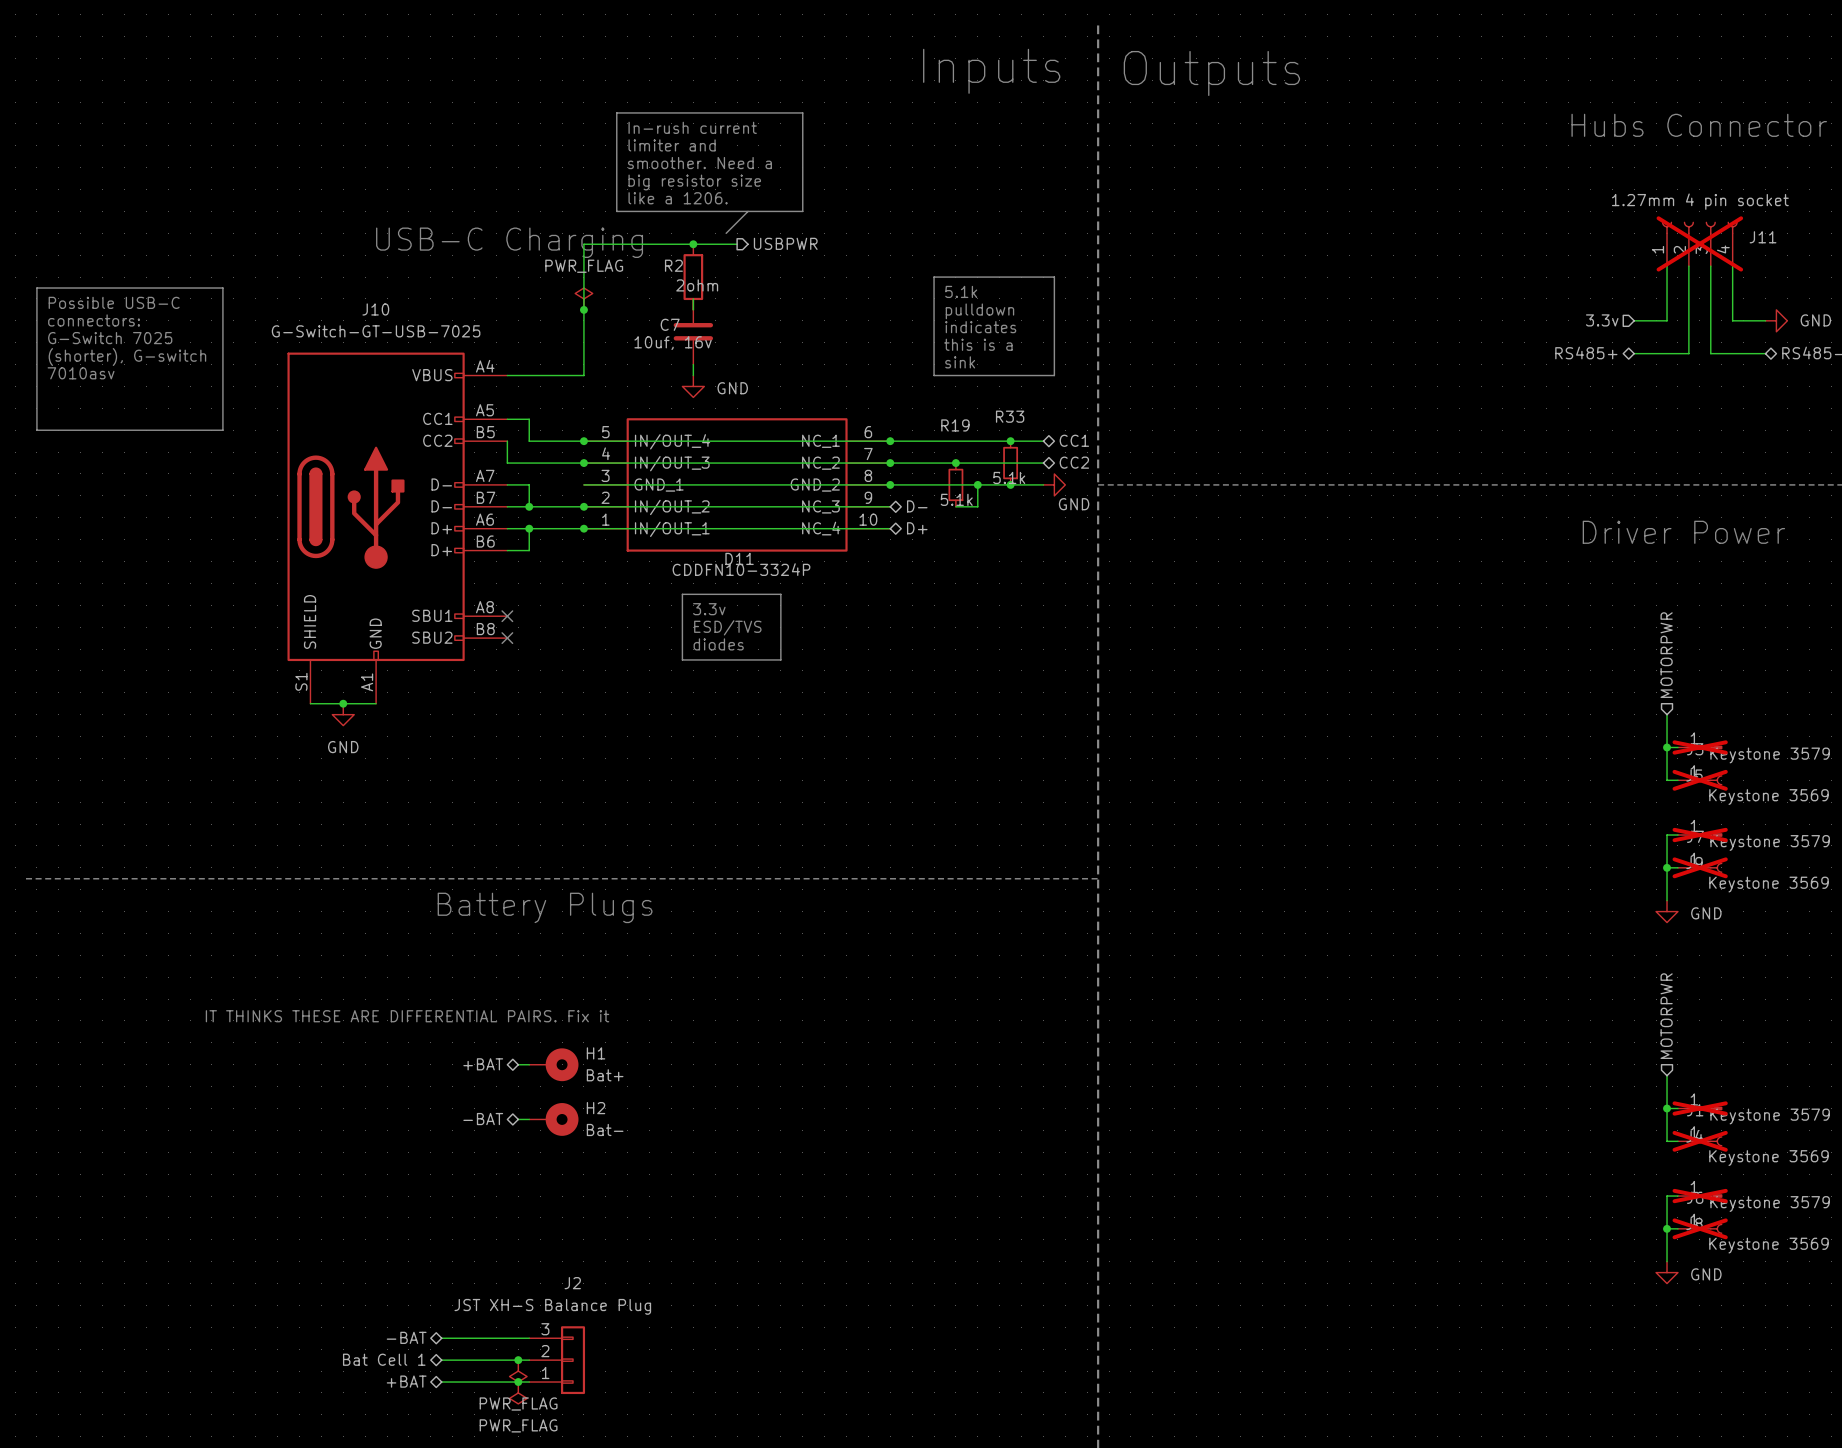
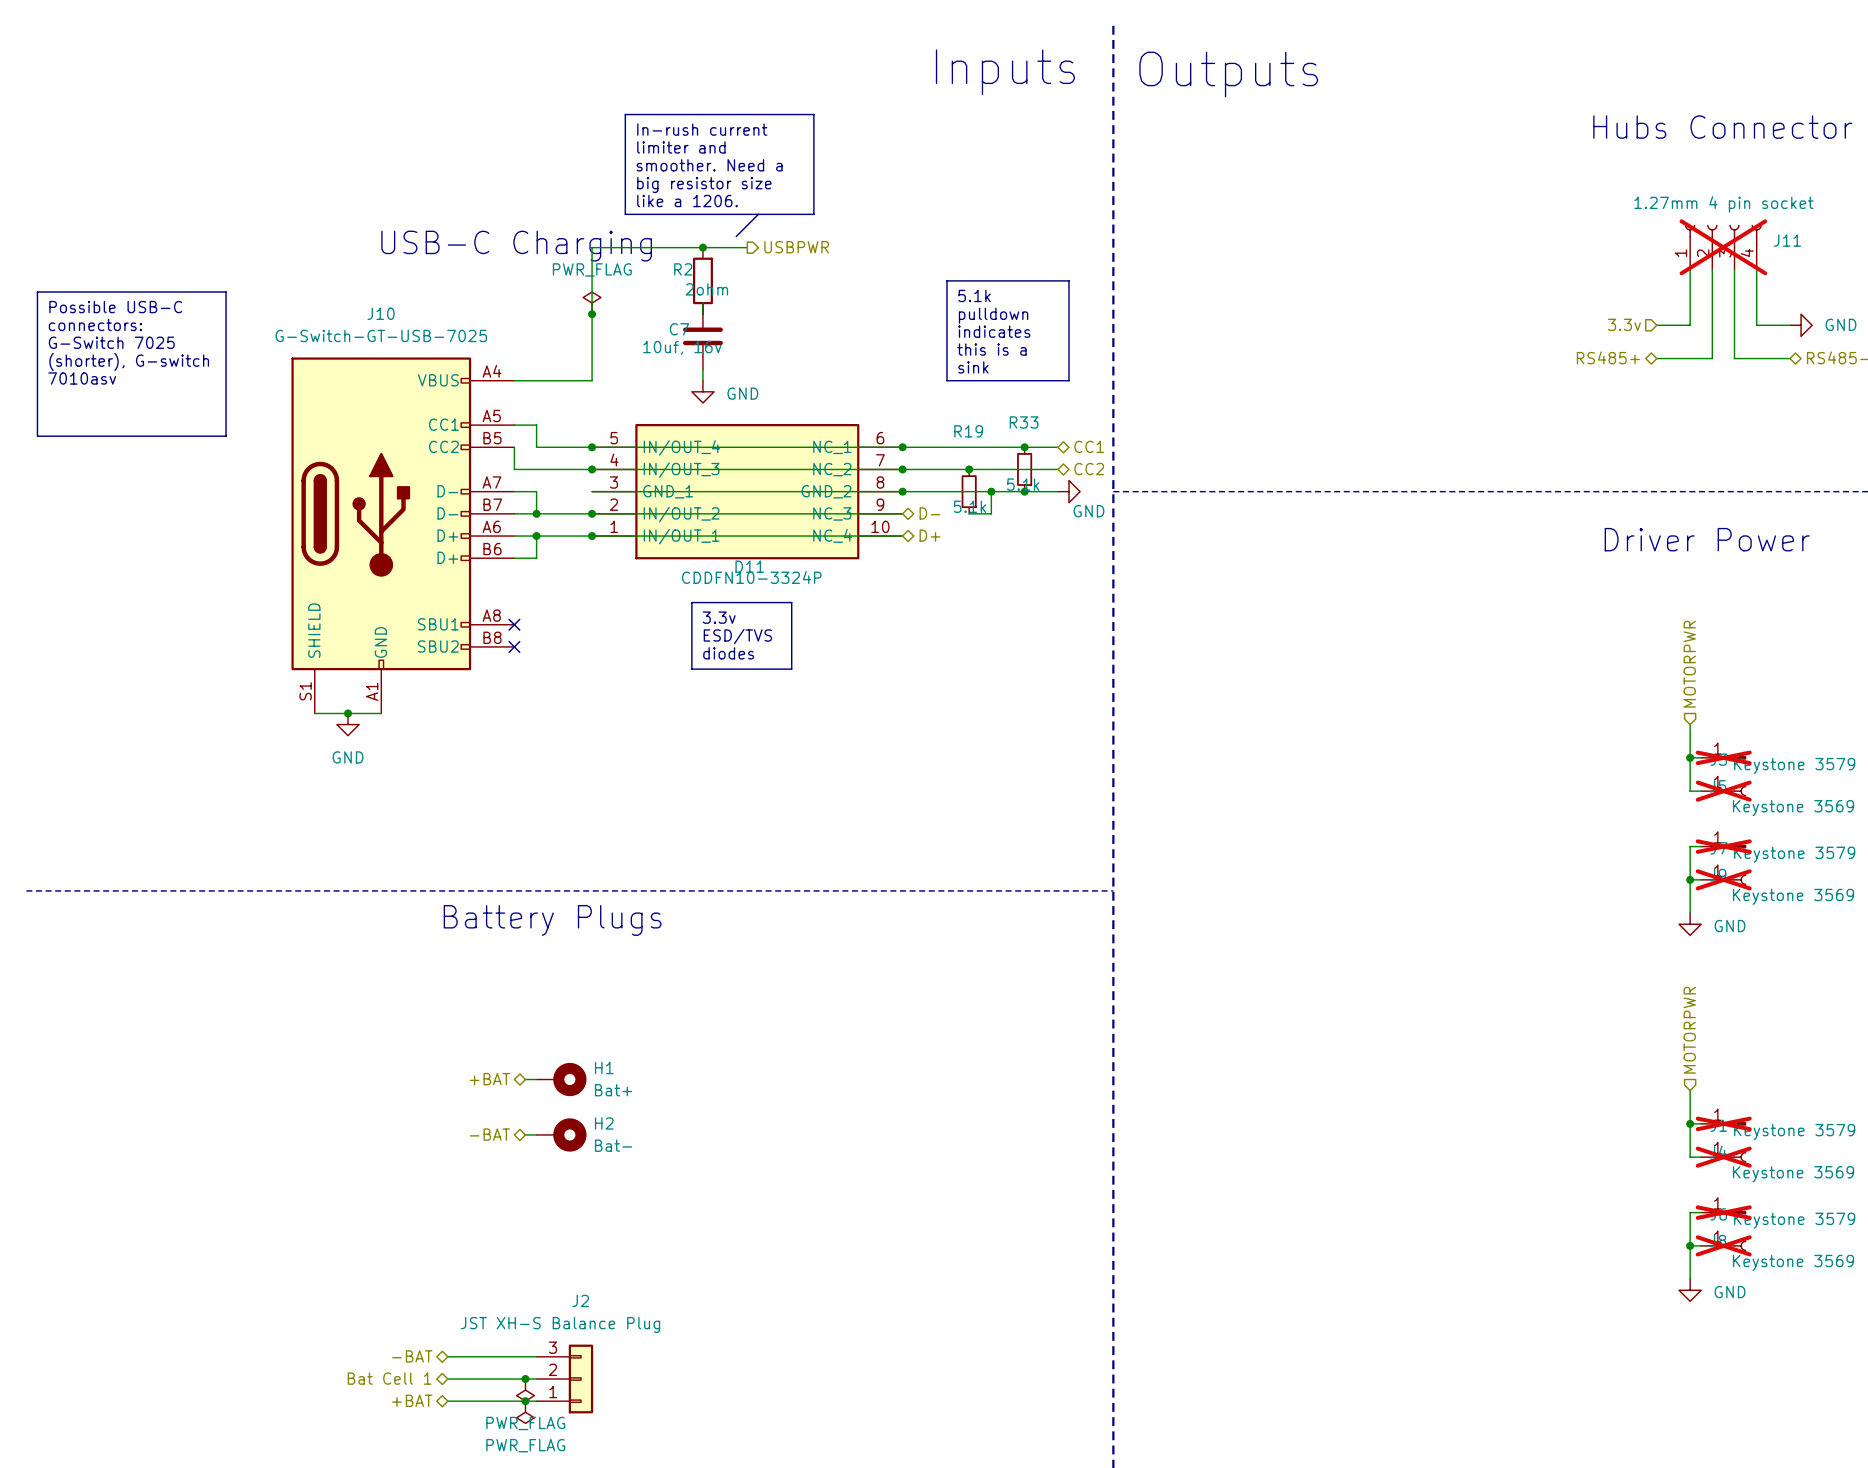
text: IT THINKS THESE ARE DIFFERENTIAL PAIRS. Fix it (407, 1016) -> none

